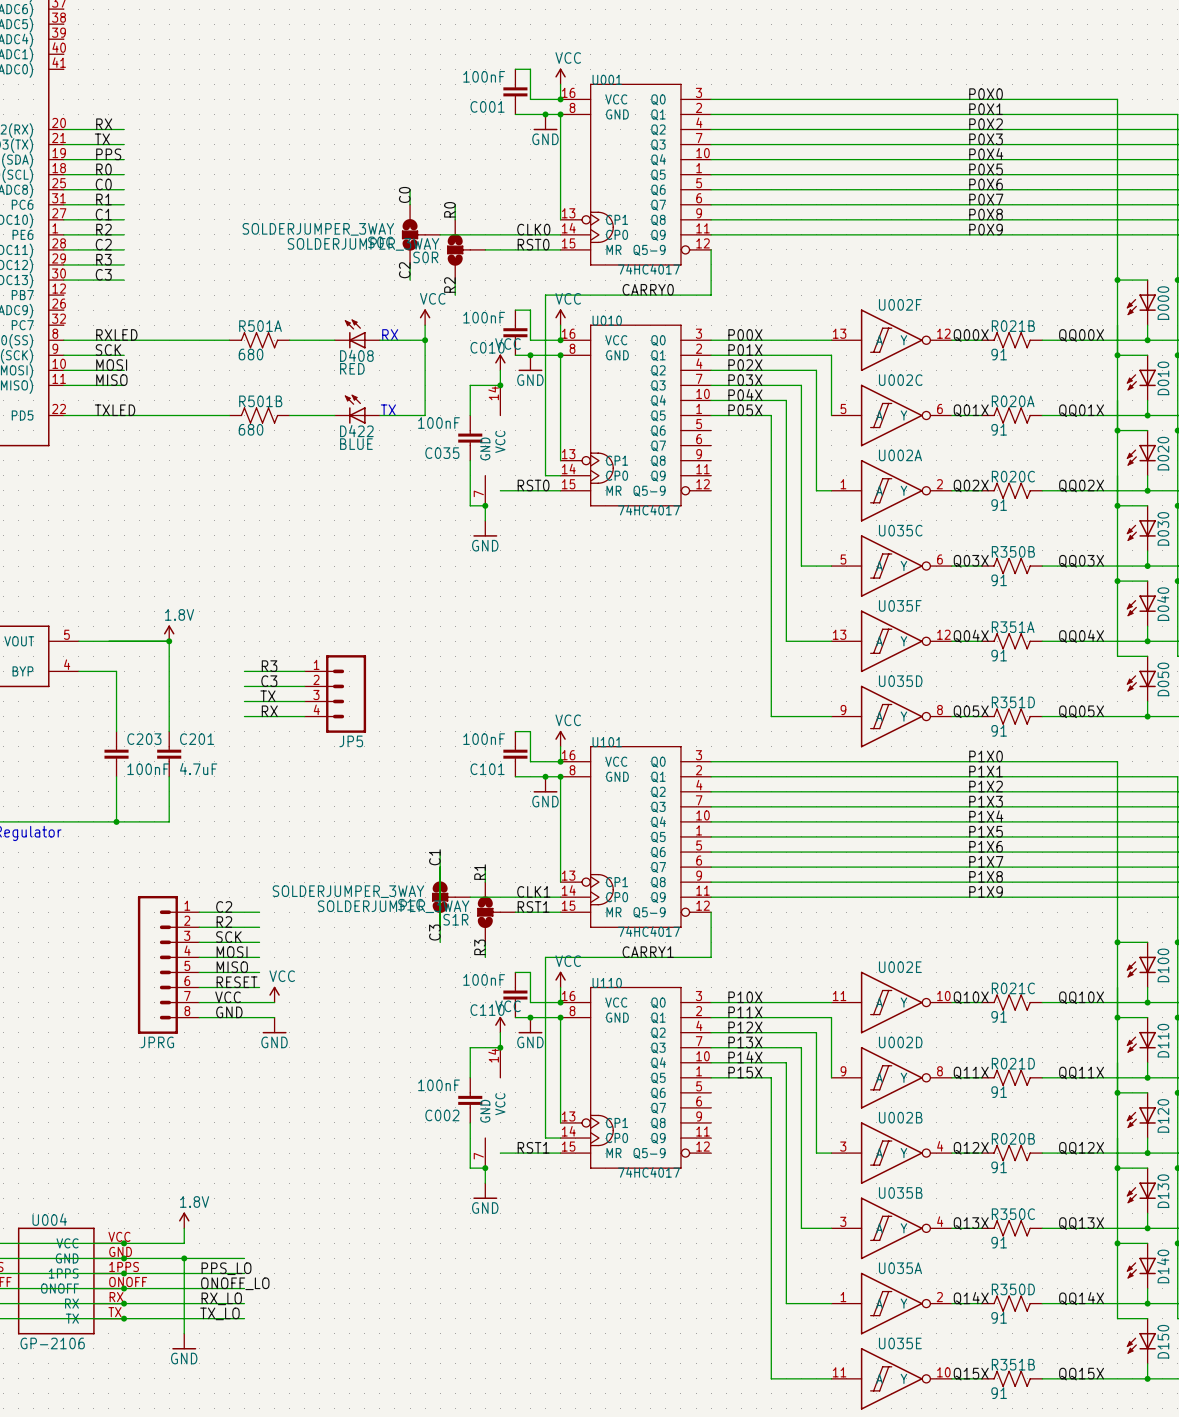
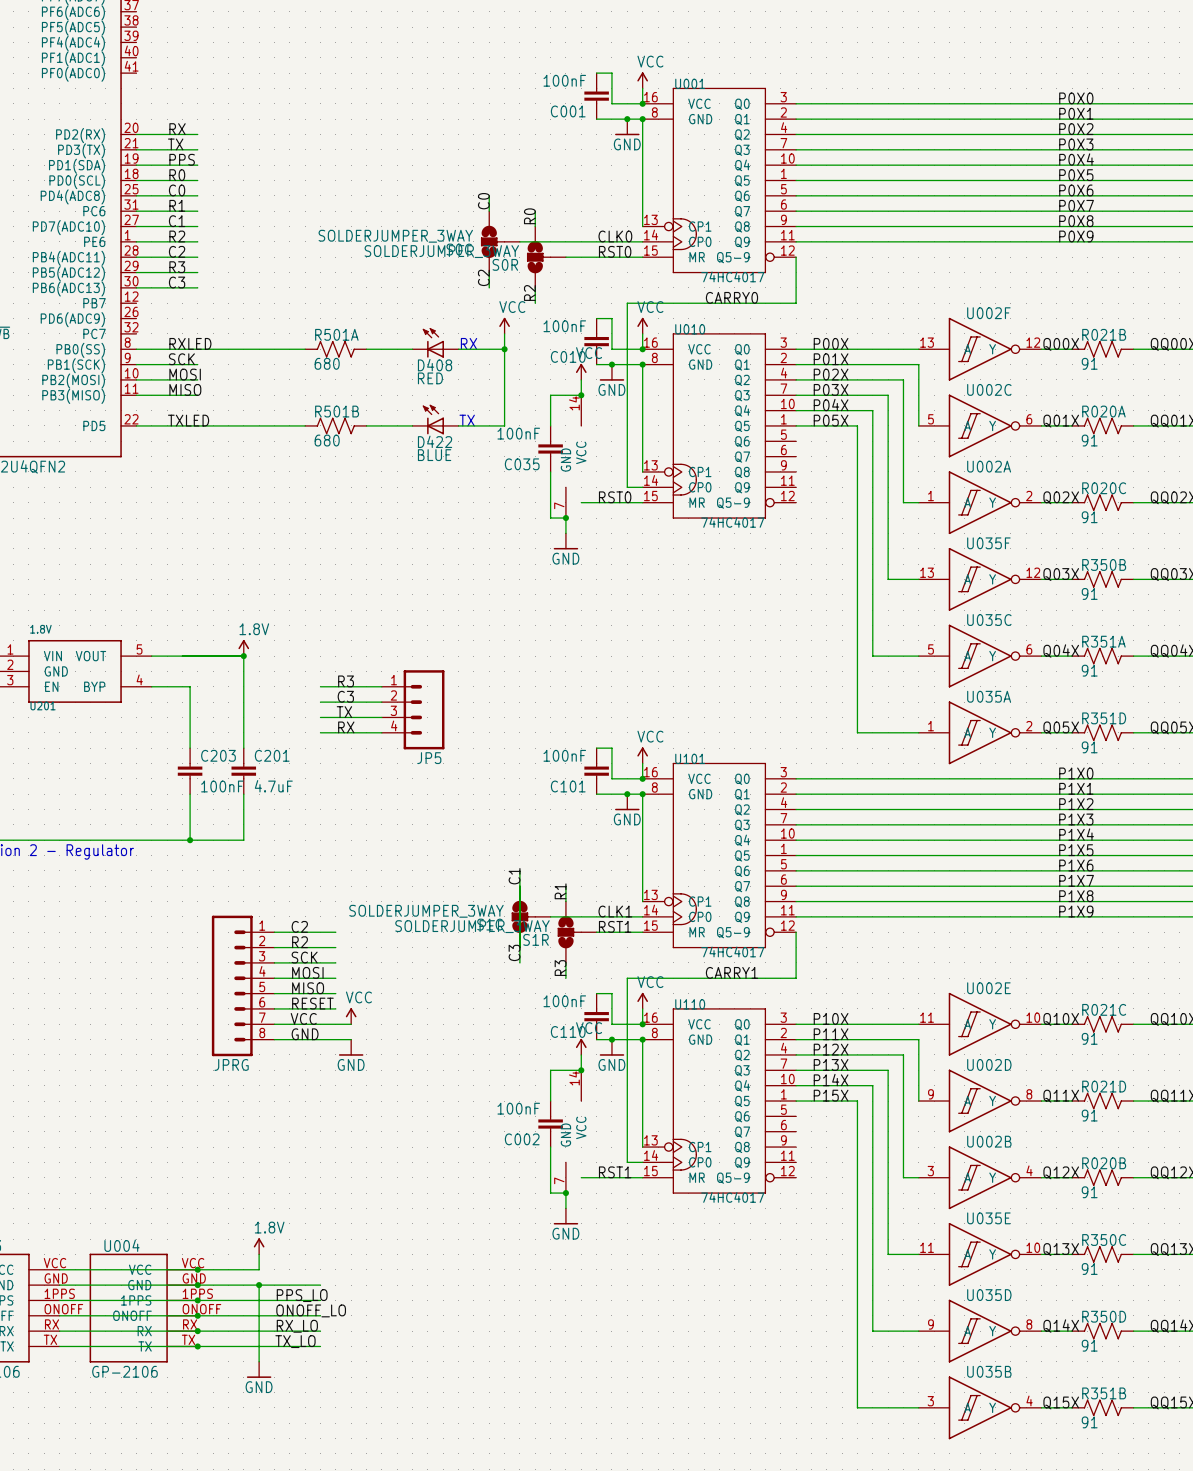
U035C position: (891, 566) -> (980, 656)
U035F position: (891, 641) -> (980, 579)
U035D position: (891, 716) -> (980, 1331)
U035B position: (891, 1228) -> (980, 1407)
U035A position: (891, 1303) -> (980, 732)
U035E position: (891, 1378) -> (980, 1254)

